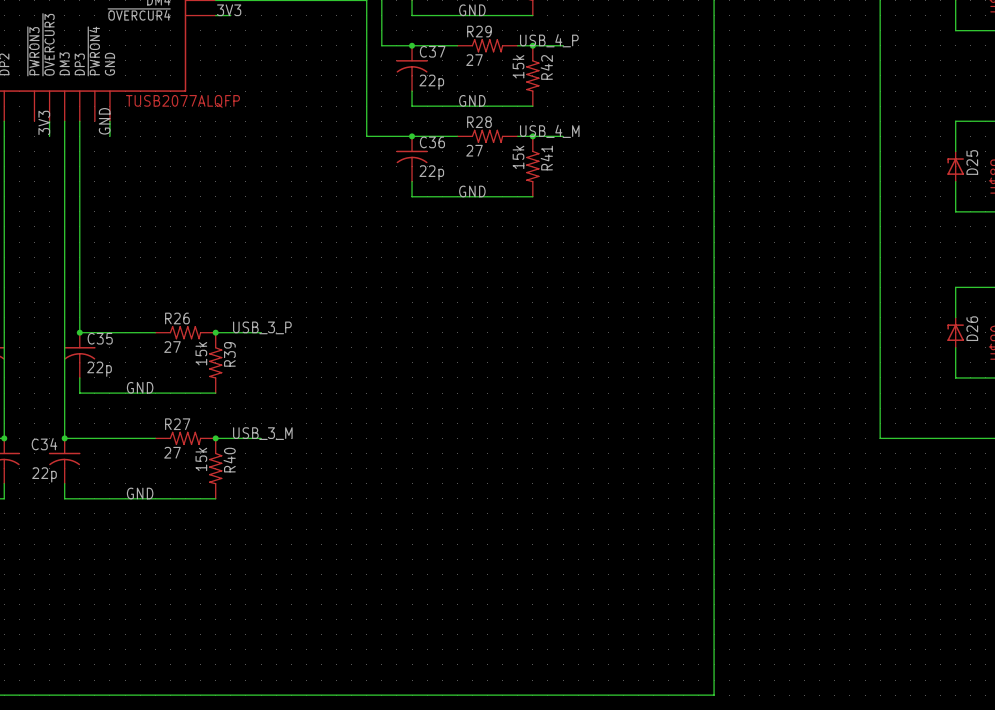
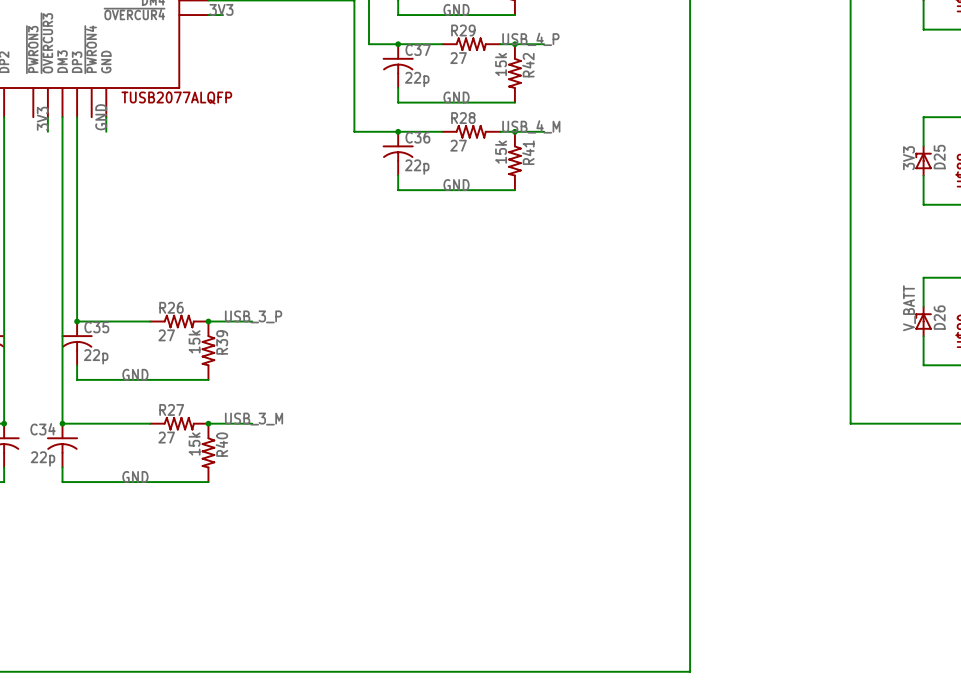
D25 value: none -> 3V3 (909, 158)
D26 value: none -> V_BATT (909, 308)

